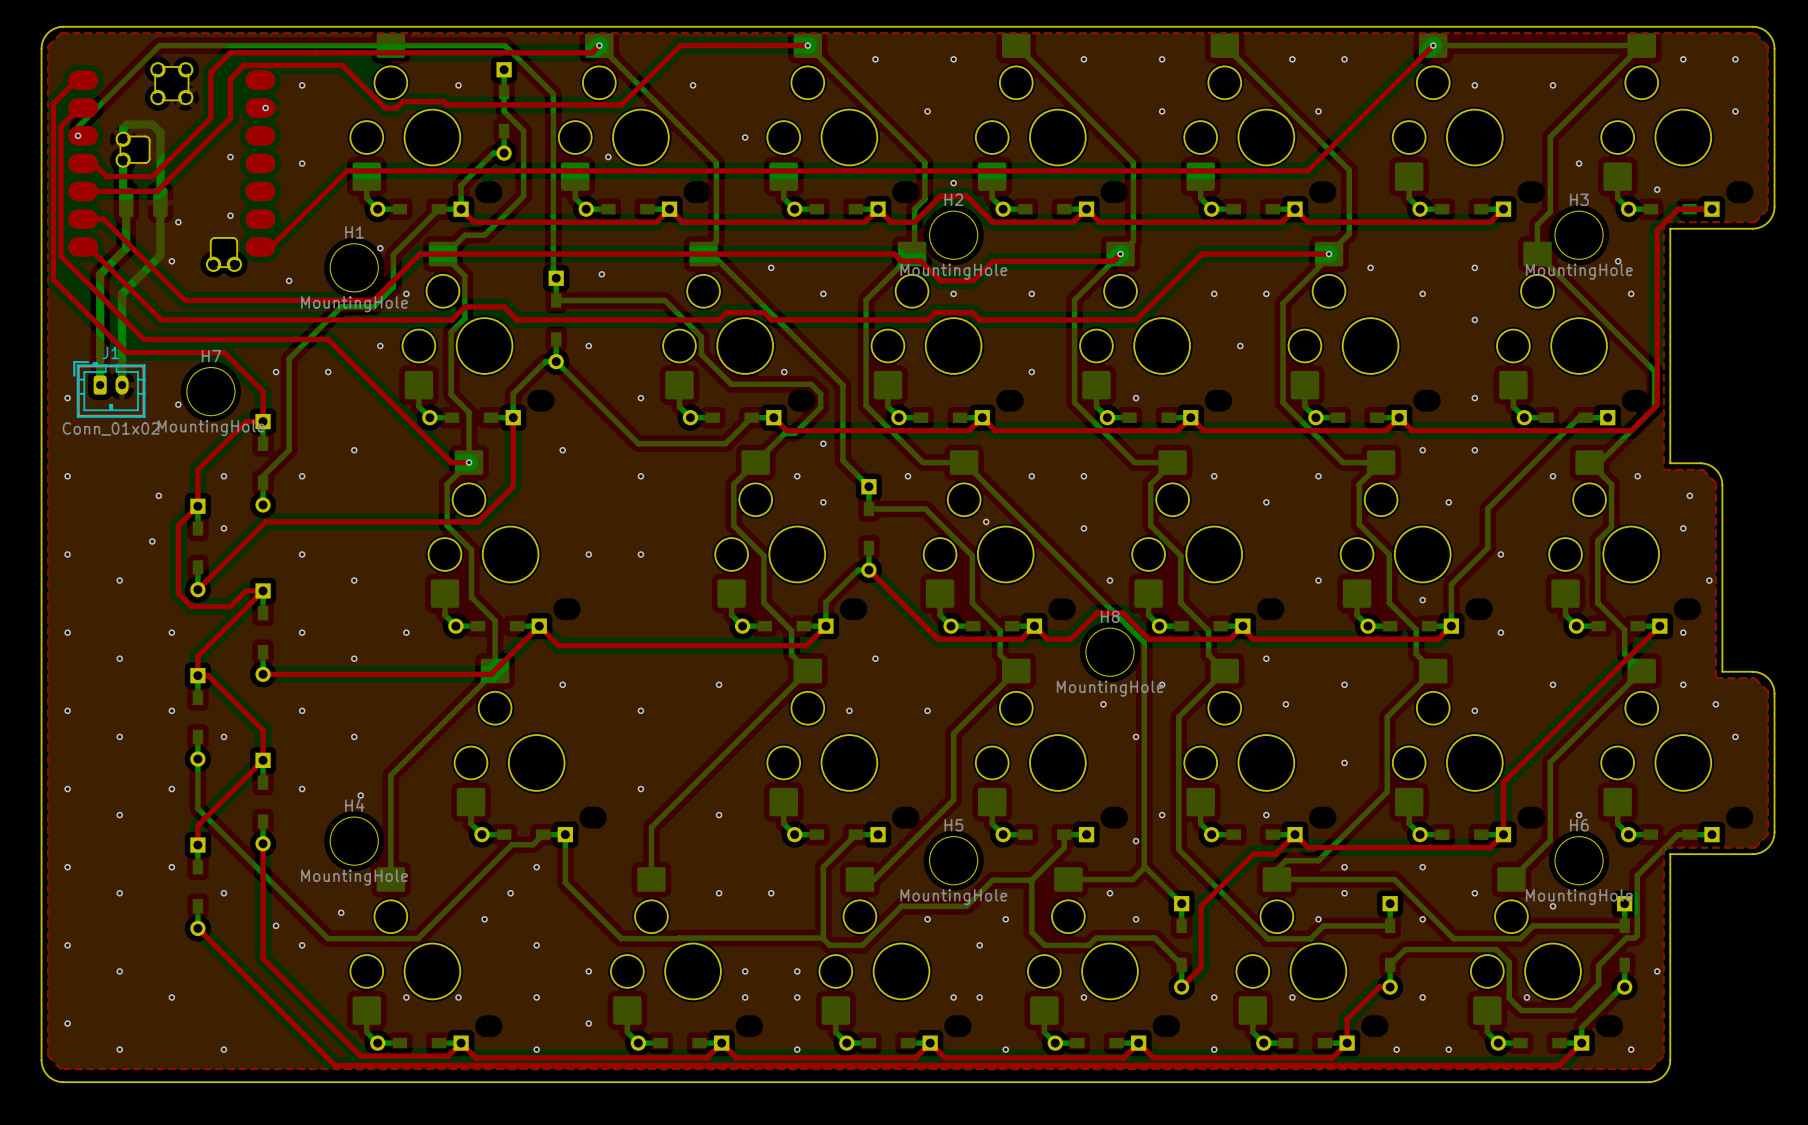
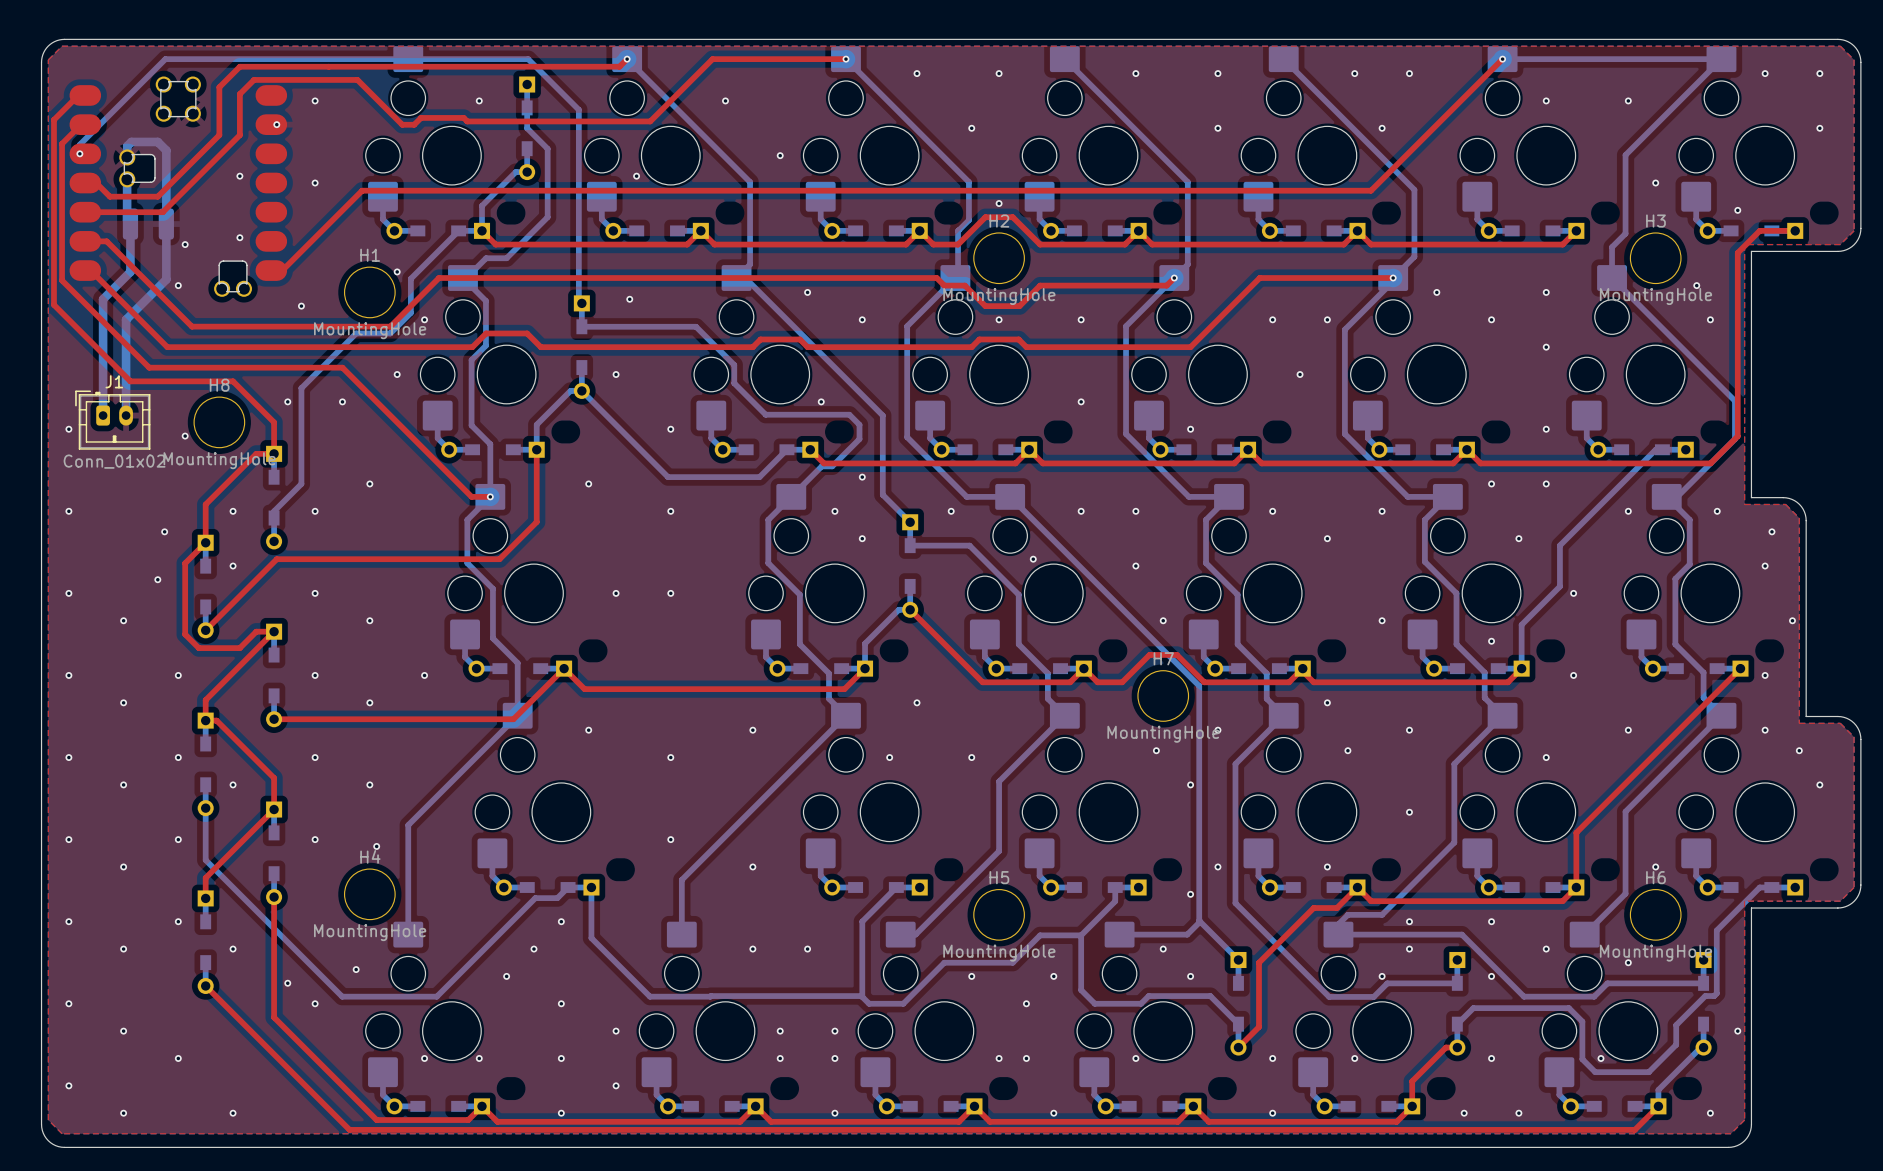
H7 name: H7 (211, 356) -> H8 (219, 385)
H8 name: H8 (1110, 616) -> H7 (1163, 658)

